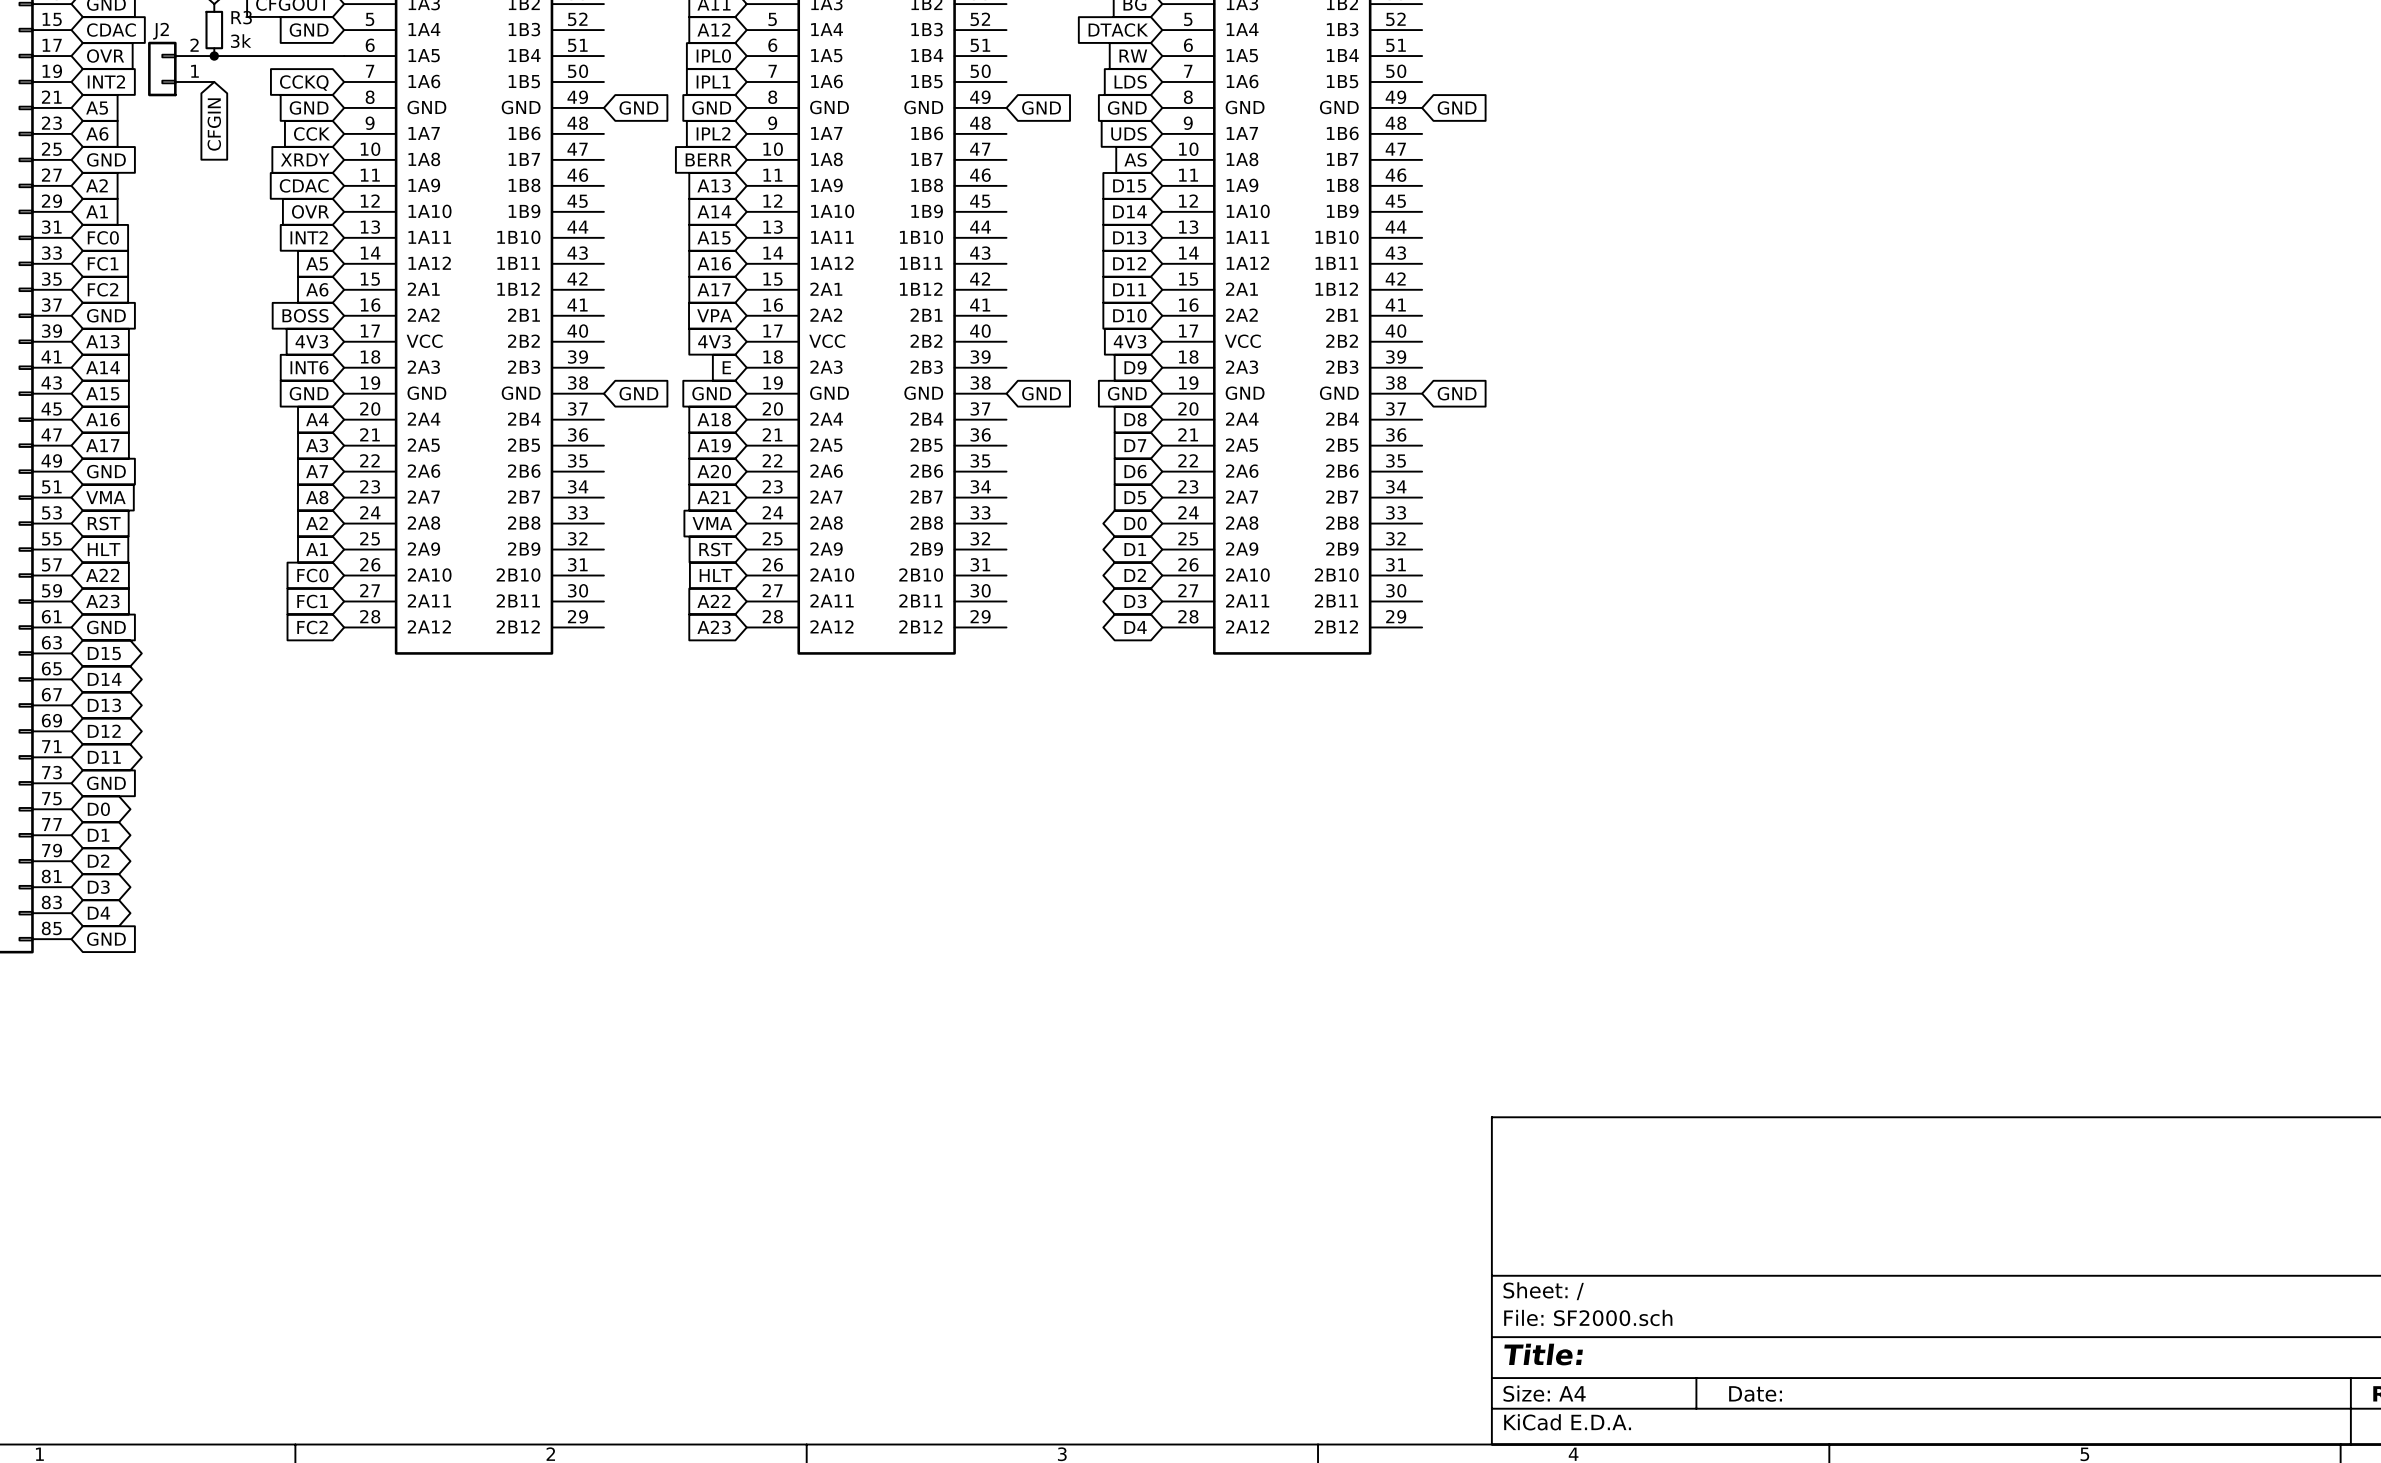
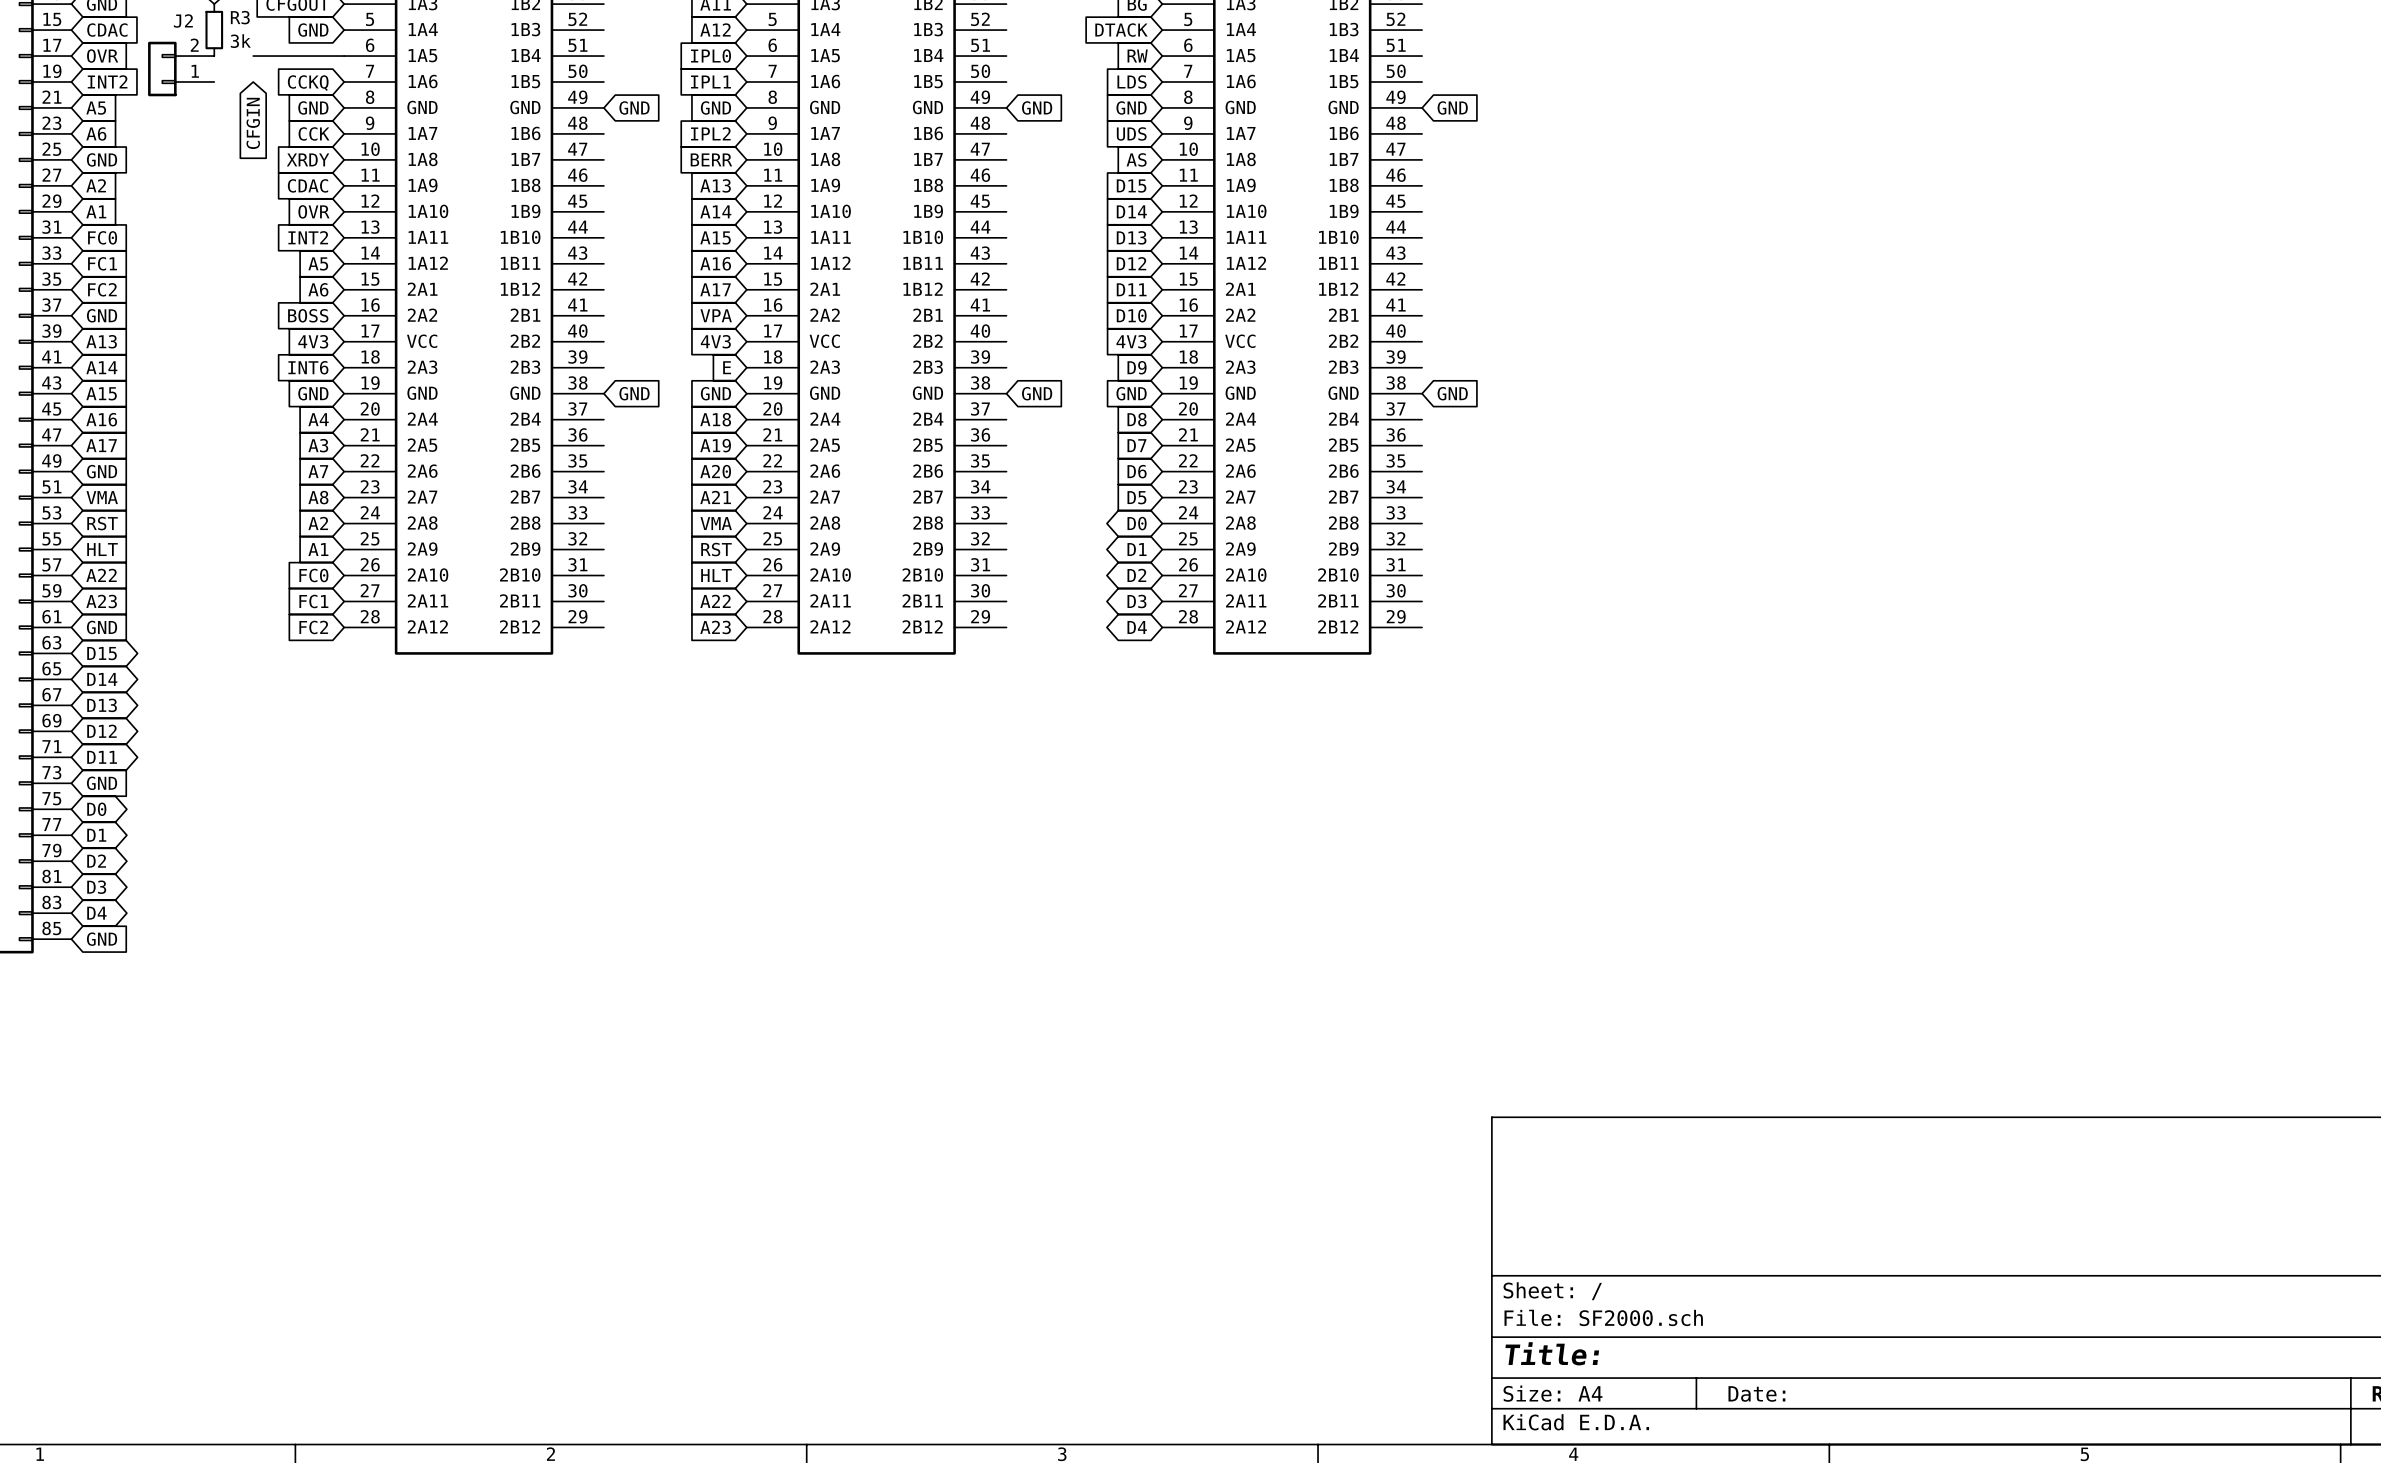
J2 name position: J2 (160, 31) -> J2 (183, 21)
wire: (214, 56) (253, 56) -> none
junction: (214, 56) -> none
global label position: CFGIN (214, 124) -> CFGIN (253, 123)

